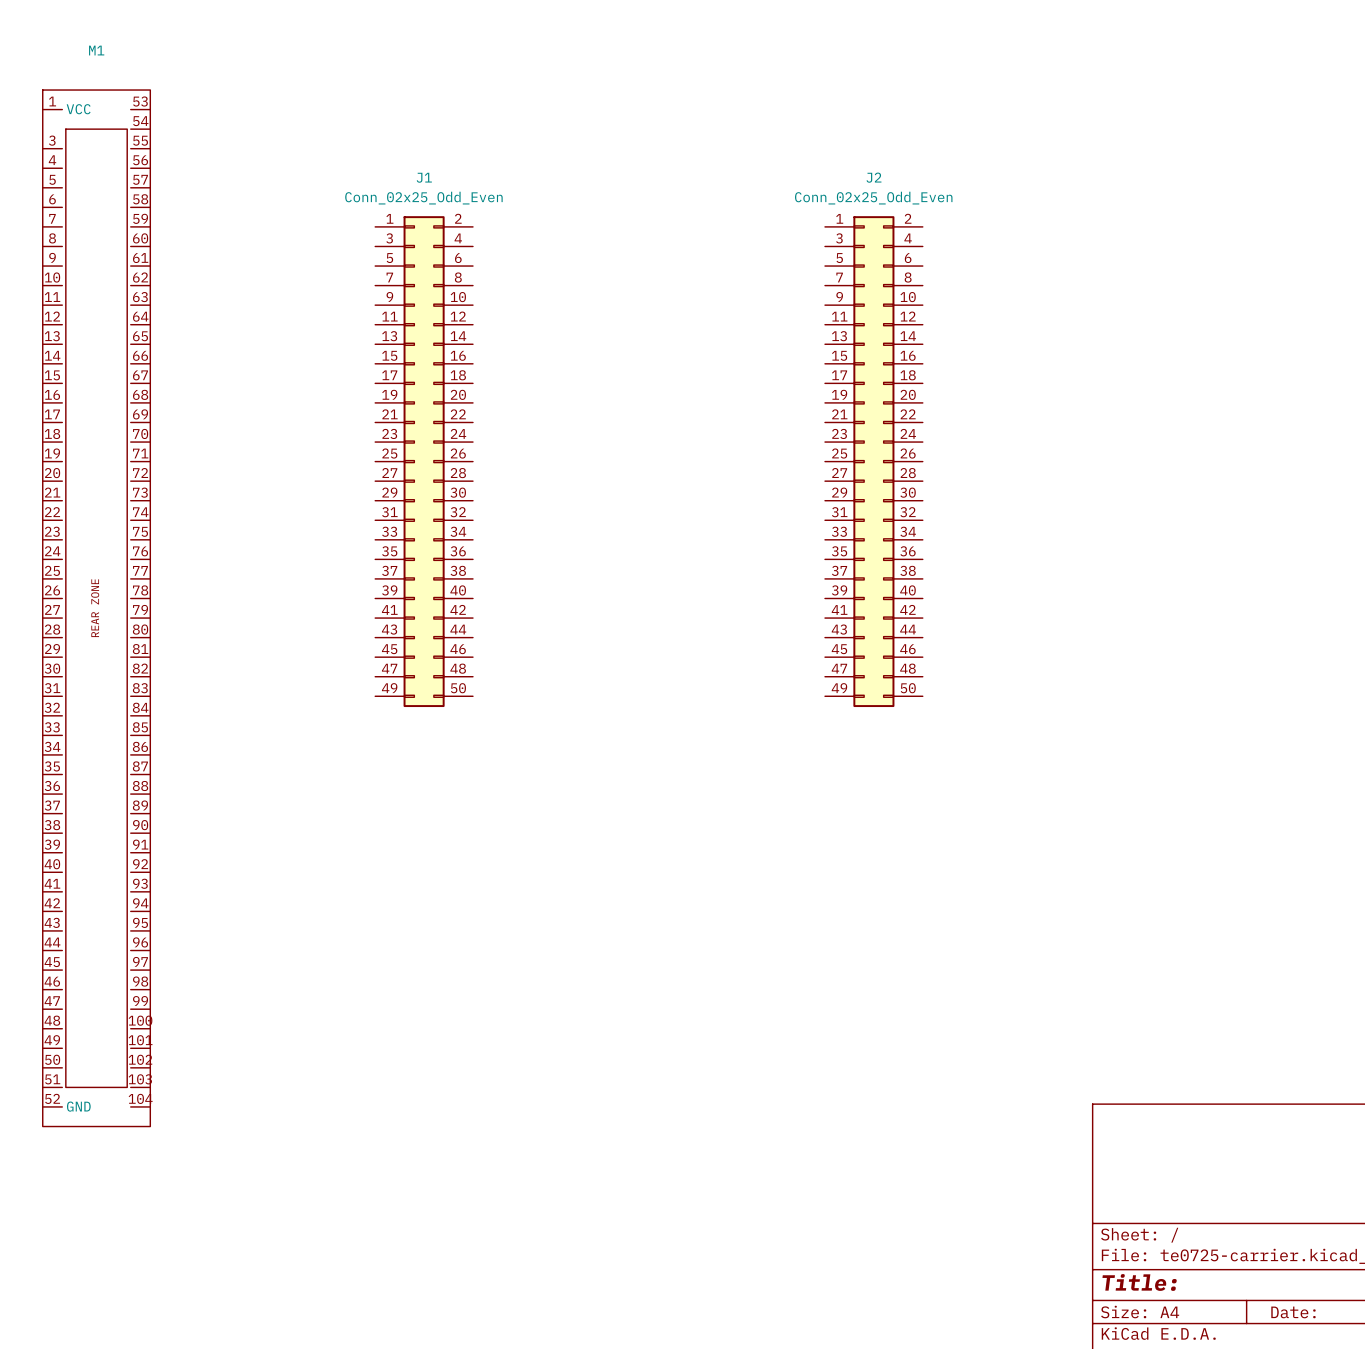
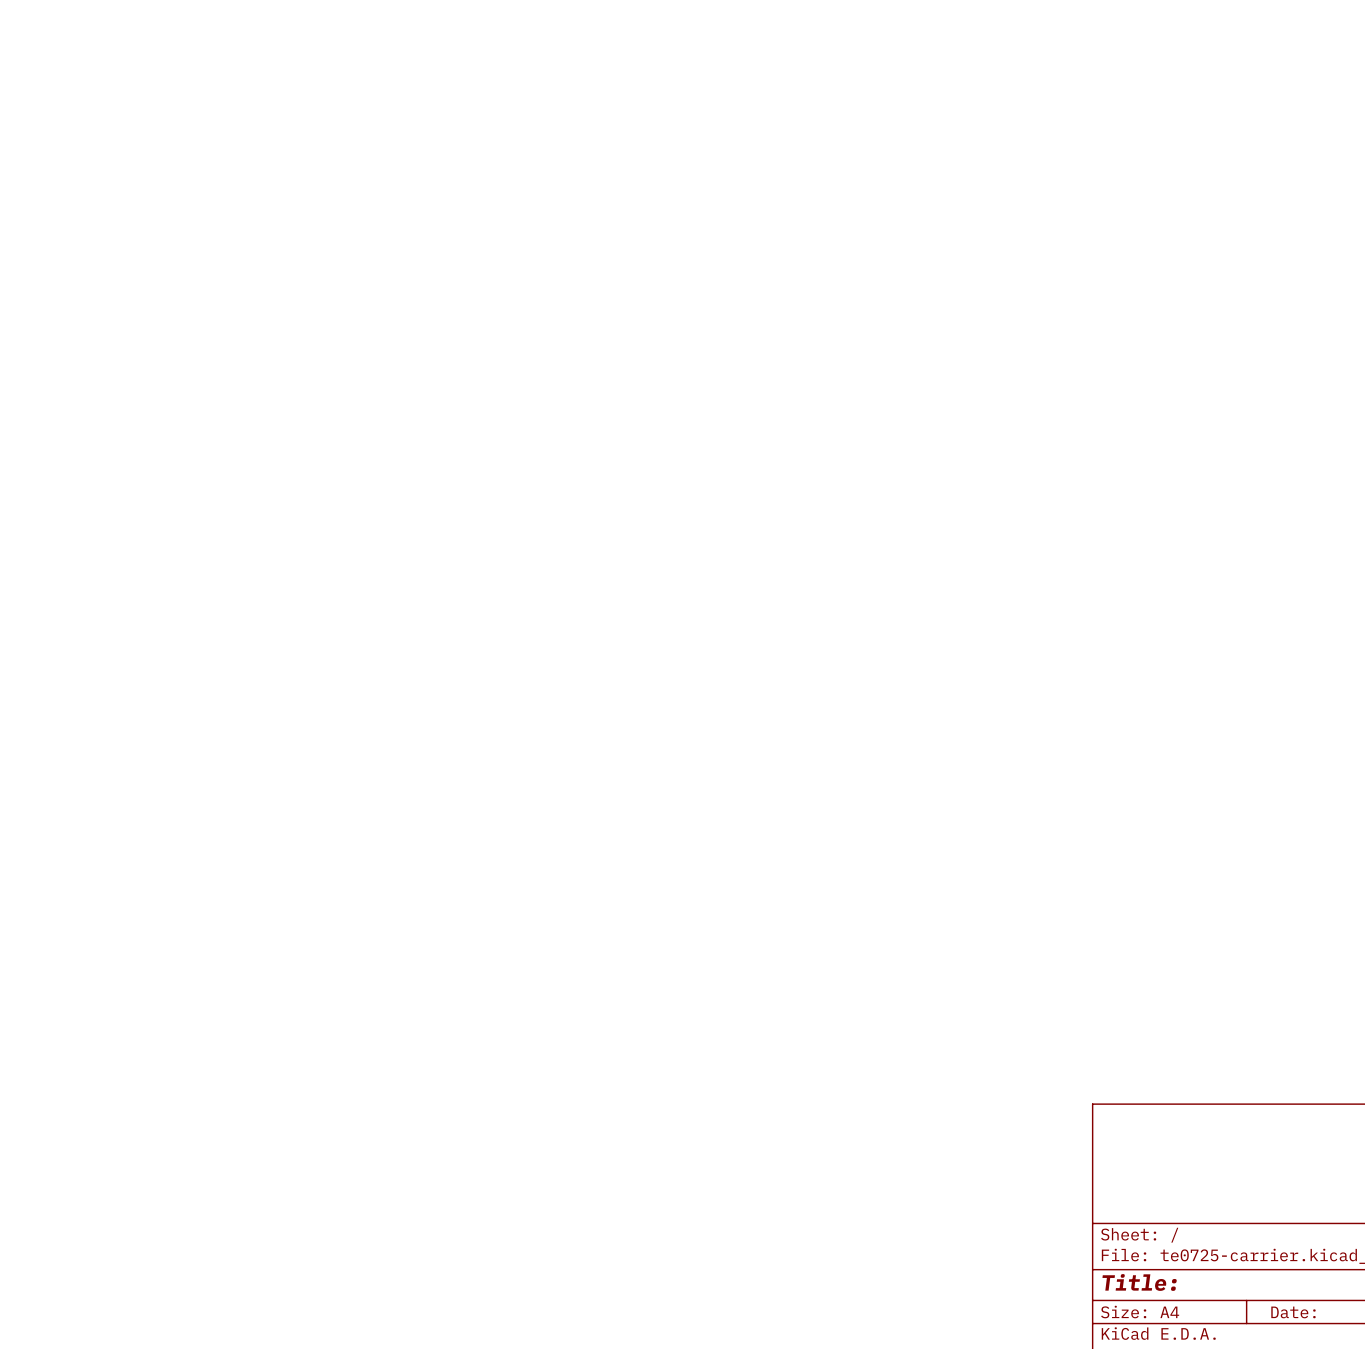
J1: Conn_02x25_Odd_Even (424, 461) -> none
J2: Conn_02x25_Odd_Even (873, 461) -> none
M1: (96, 608) -> none

